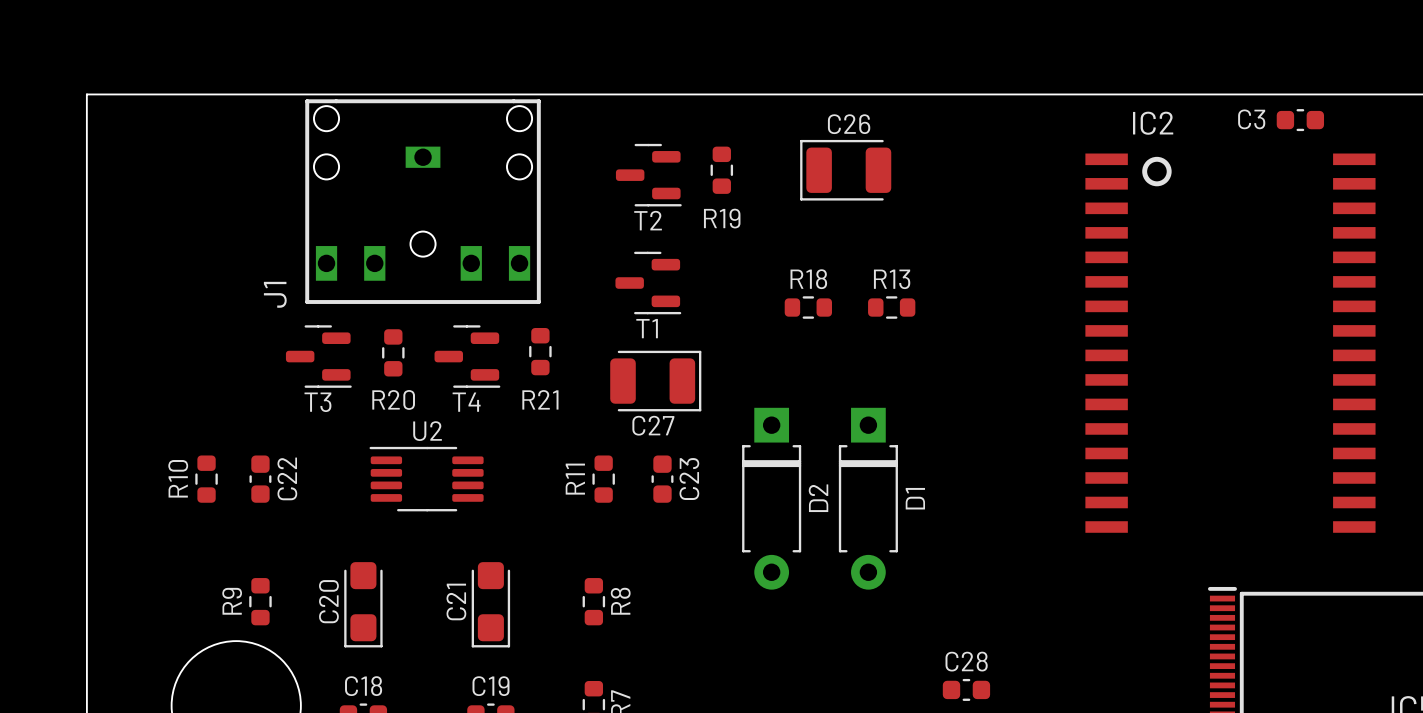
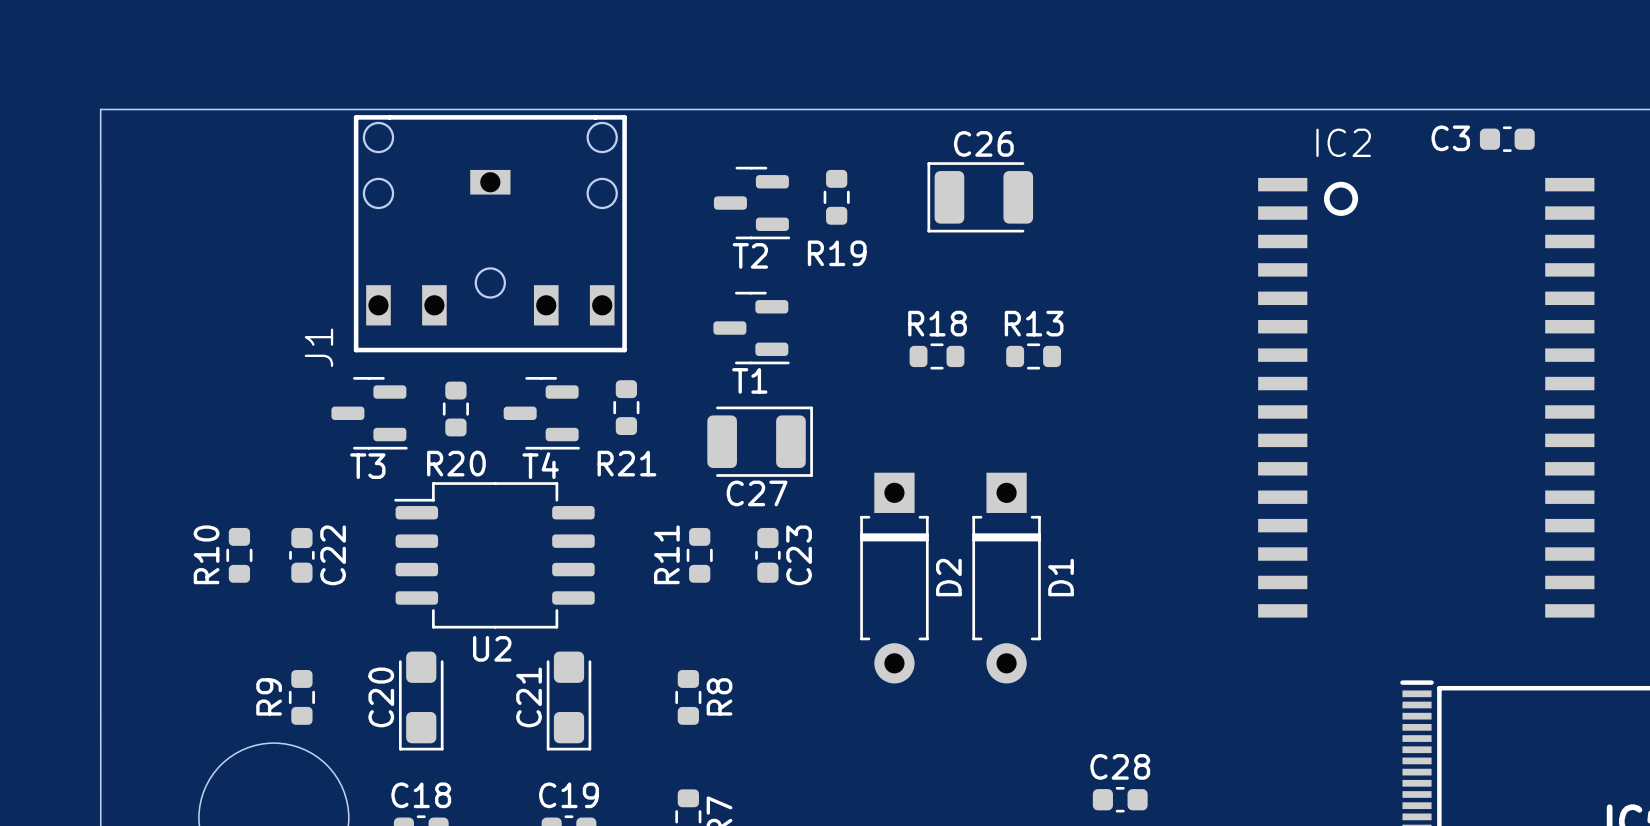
U2 name position: U2 (427, 431) -> U2 (492, 648)
U2 footprint: [369, 446, 484, 512] -> [394, 482, 595, 629]

